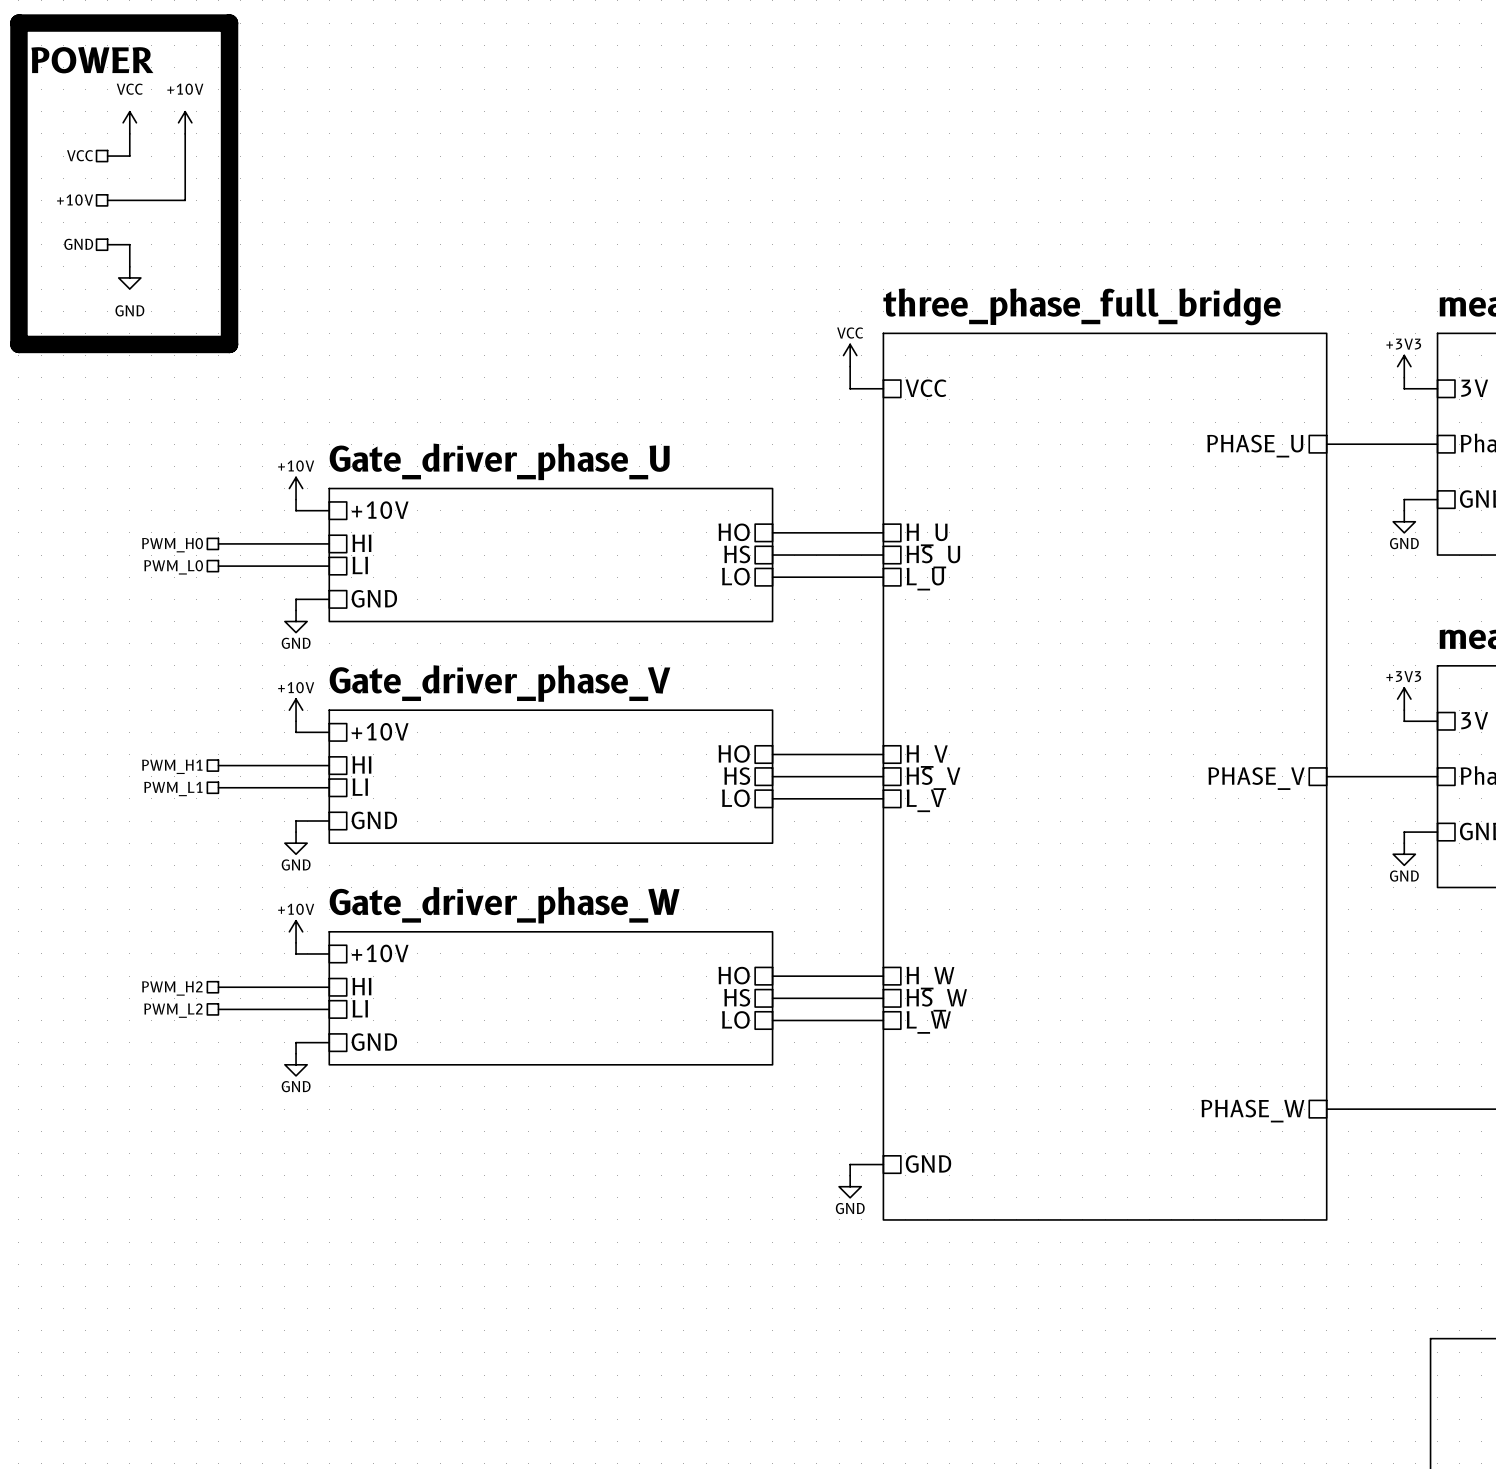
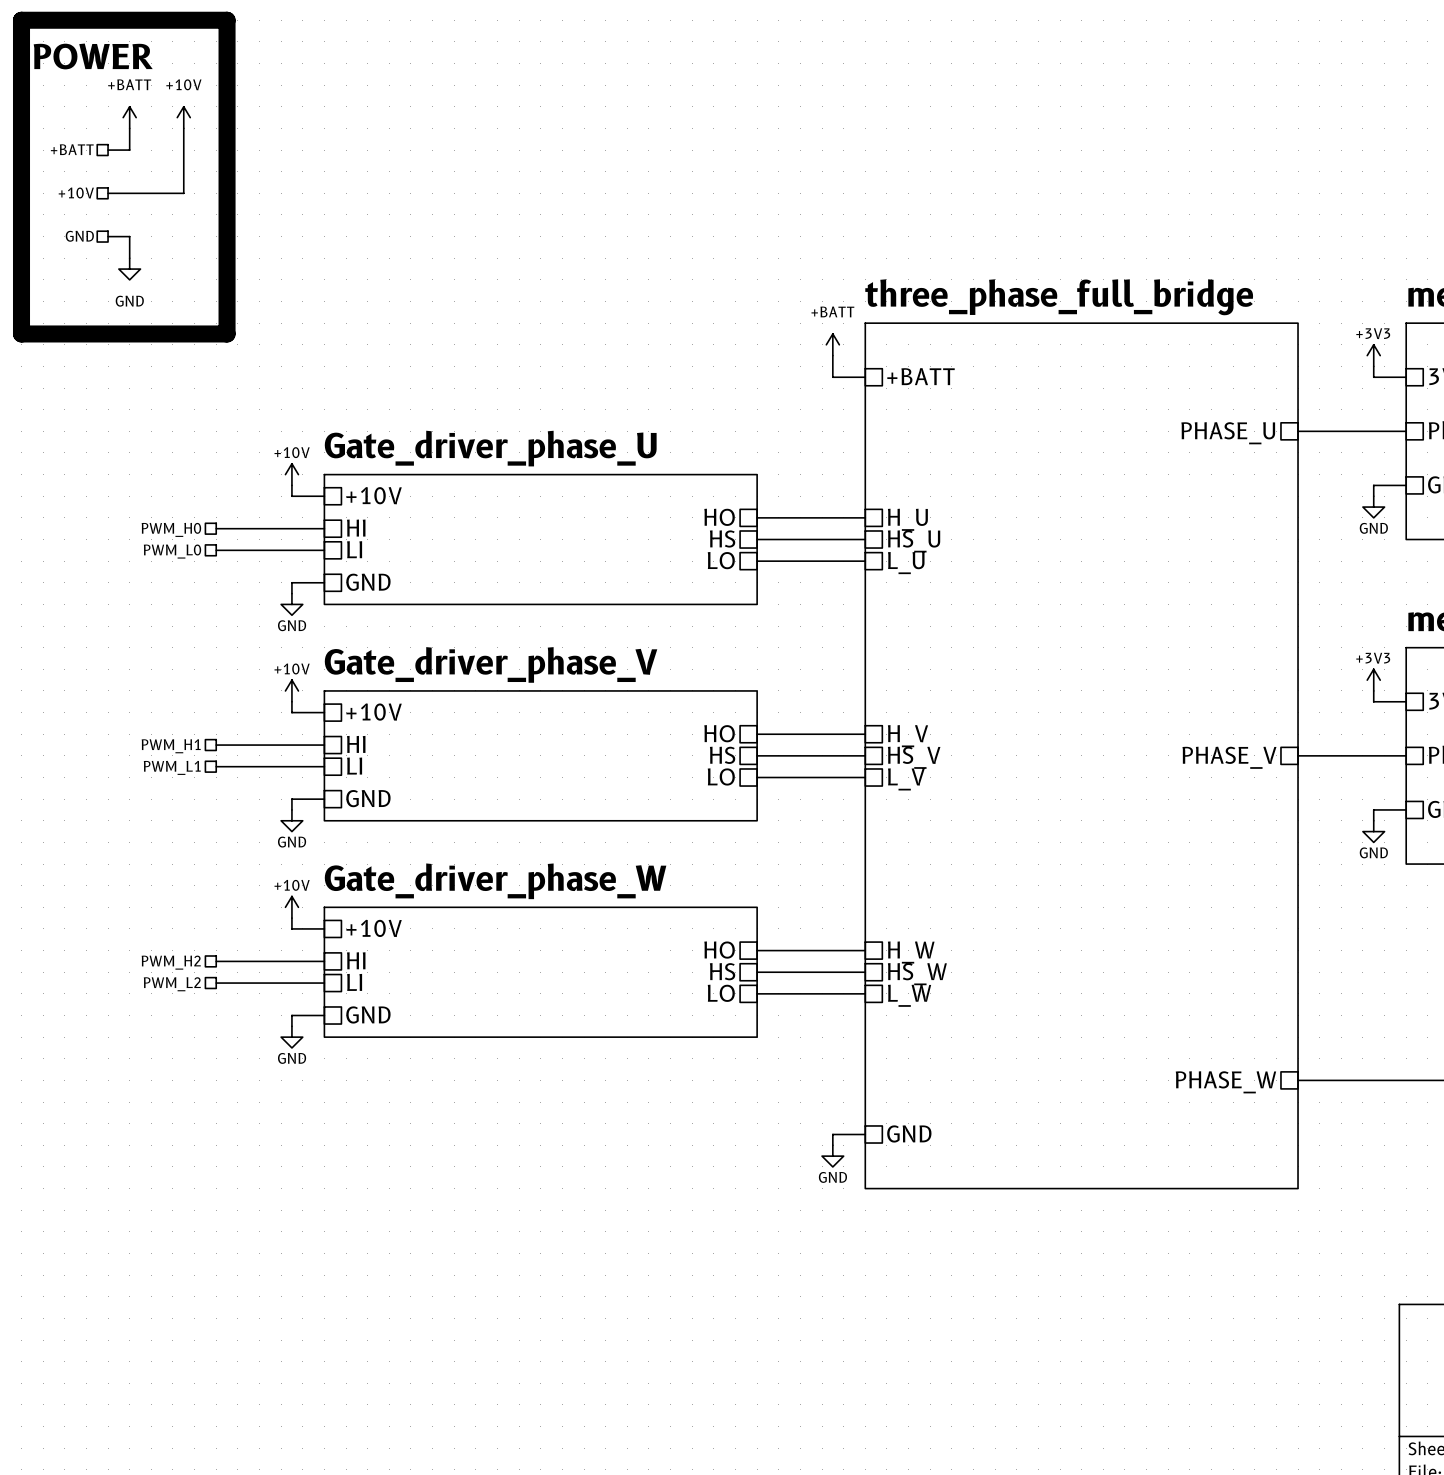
power symbol: VCC (129, 122) -> +BATT (129, 117)
hierarchical label: VCC (80, 155) -> +BATT (72, 149)
power symbol: VCC (850, 355) -> +BATT (832, 344)
sheet pin: VCC (925, 388) -> +BATT (921, 376)

